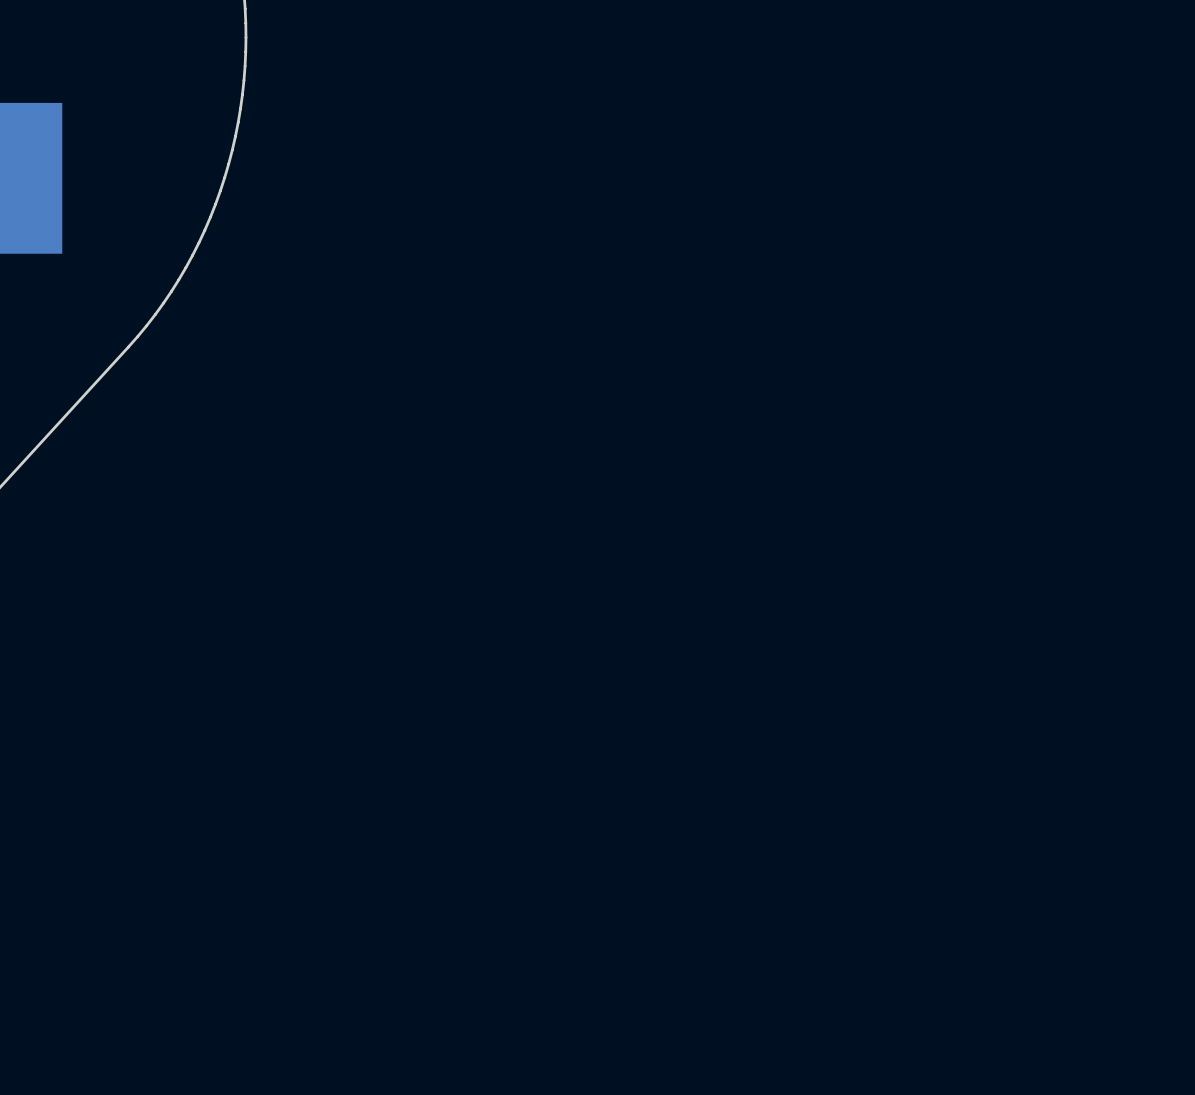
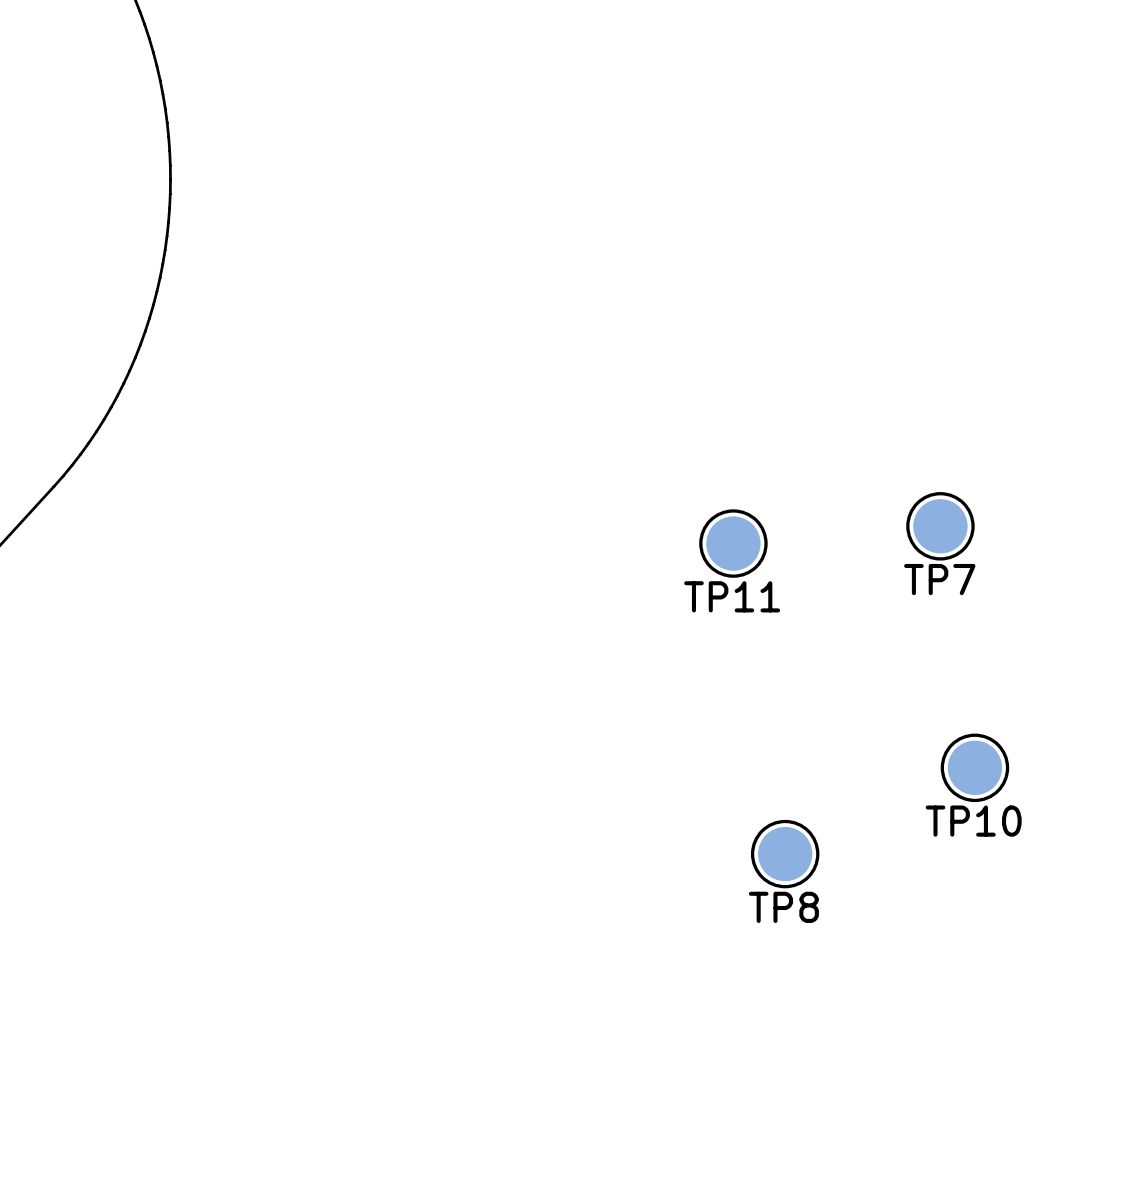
TP7: none -> (940, 526)
TP11: none -> (733, 543)
TP10: none -> (974, 767)
TP8: none -> (785, 854)

